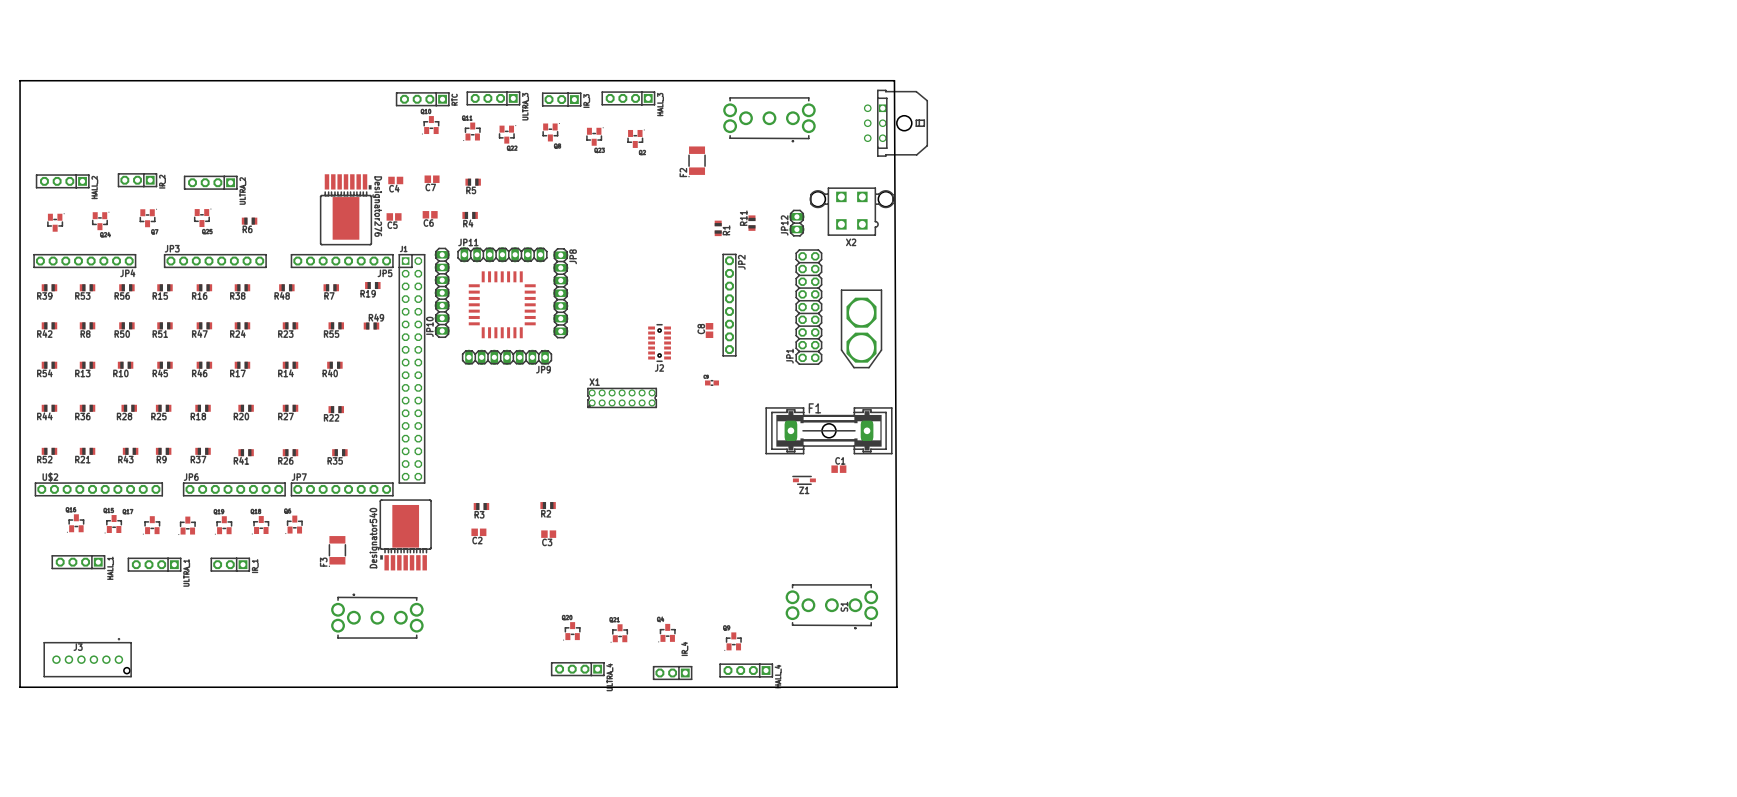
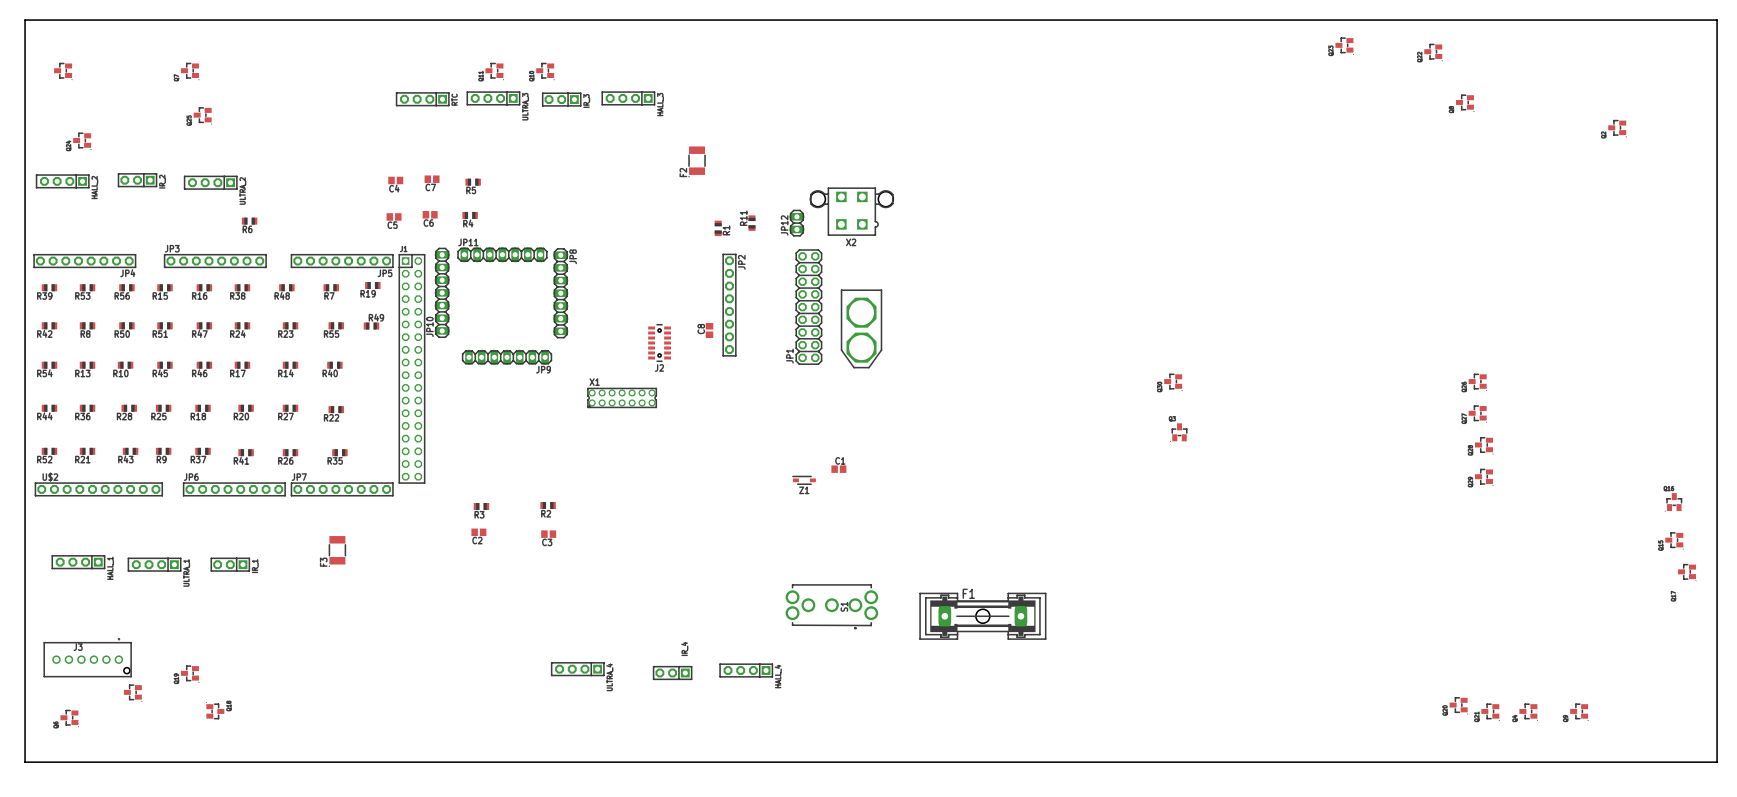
board edge: none -> (25, 20) (1717, 20) (1717, 762) (25, 762) (25, 20)
part: none -> (63, 71)
board edge: (20, 80) (894, 80) (896, 687) (20, 687) (20, 80) -> none
part: (769, 119) -> none
part: (895, 123) -> none
part rotation: 0° (430, 125) -> 90° counterclockwise (545, 71)
part position: (430, 125) -> (545, 71)
part rotation: 0° (471, 131) -> 90° counterclockwise (494, 71)
part position: (471, 131) -> (494, 71)
part rotation: 0° (551, 132) -> 90° clockwise (1465, 103)
part position: (551, 132) -> (1465, 103)
part rotation: 0° (507, 134) -> 90° clockwise (1433, 52)
part position: (507, 134) -> (1433, 52)
part rotation: 0° (595, 136) -> 90° clockwise (1344, 46)
part position: (595, 136) -> (1344, 46)
part rotation: 0° (636, 138) -> 90° clockwise (1617, 128)
part position: (636, 138) -> (1617, 128)
part: (346, 209) -> none
part rotation: 0° (148, 217) -> 90° clockwise (190, 71)
part position: (148, 217) -> (190, 71)
part rotation: 0° (202, 217) -> 90° clockwise (202, 116)
part position: (202, 217) -> (202, 116)
part rotation: 0° (100, 220) -> 90° clockwise (82, 141)
part position: (100, 220) -> (82, 141)
part: (56, 222) -> none
part: (502, 304) -> none
part: (712, 382) -> none
part: none -> (1173, 382)
part: none -> (1477, 382)
part: none -> (1477, 414)
F1 position: (828, 430) -> (982, 616)
part: none -> (1178, 432)
part: none -> (1484, 445)
part: none -> (1484, 477)
part position: (75, 523) -> (1673, 502)
part rotation: 0° (113, 524) -> 90° counterclockwise (1674, 541)
part position: (113, 524) -> (1674, 541)
part rotation: 0° (293, 524) -> 90° counterclockwise (69, 718)
part position: (293, 524) -> (69, 718)
part rotation: 0° (151, 525) -> 90° counterclockwise (1687, 572)
part position: (151, 525) -> (1687, 572)
part: (186, 525) -> none
part rotation: 0° (223, 525) -> 90° counterclockwise (190, 674)
part position: (223, 525) -> (190, 674)
part rotation: 0° (260, 525) -> 90° clockwise (215, 710)
part position: (260, 525) -> (215, 710)
part: (405, 534) -> none
part: (377, 616) -> none
part rotation: 0° (571, 631) -> 90° counterclockwise (1458, 706)
part position: (571, 631) -> (1458, 706)
part rotation: 0° (619, 633) -> 90° counterclockwise (1490, 712)
part position: (619, 633) -> (1490, 712)
part rotation: 0° (666, 633) -> 90° counterclockwise (1528, 712)
part position: (666, 633) -> (1528, 712)
part rotation: 0° (732, 641) -> 90° counterclockwise (1579, 712)
part position: (732, 641) -> (1579, 712)
part: none -> (133, 693)

